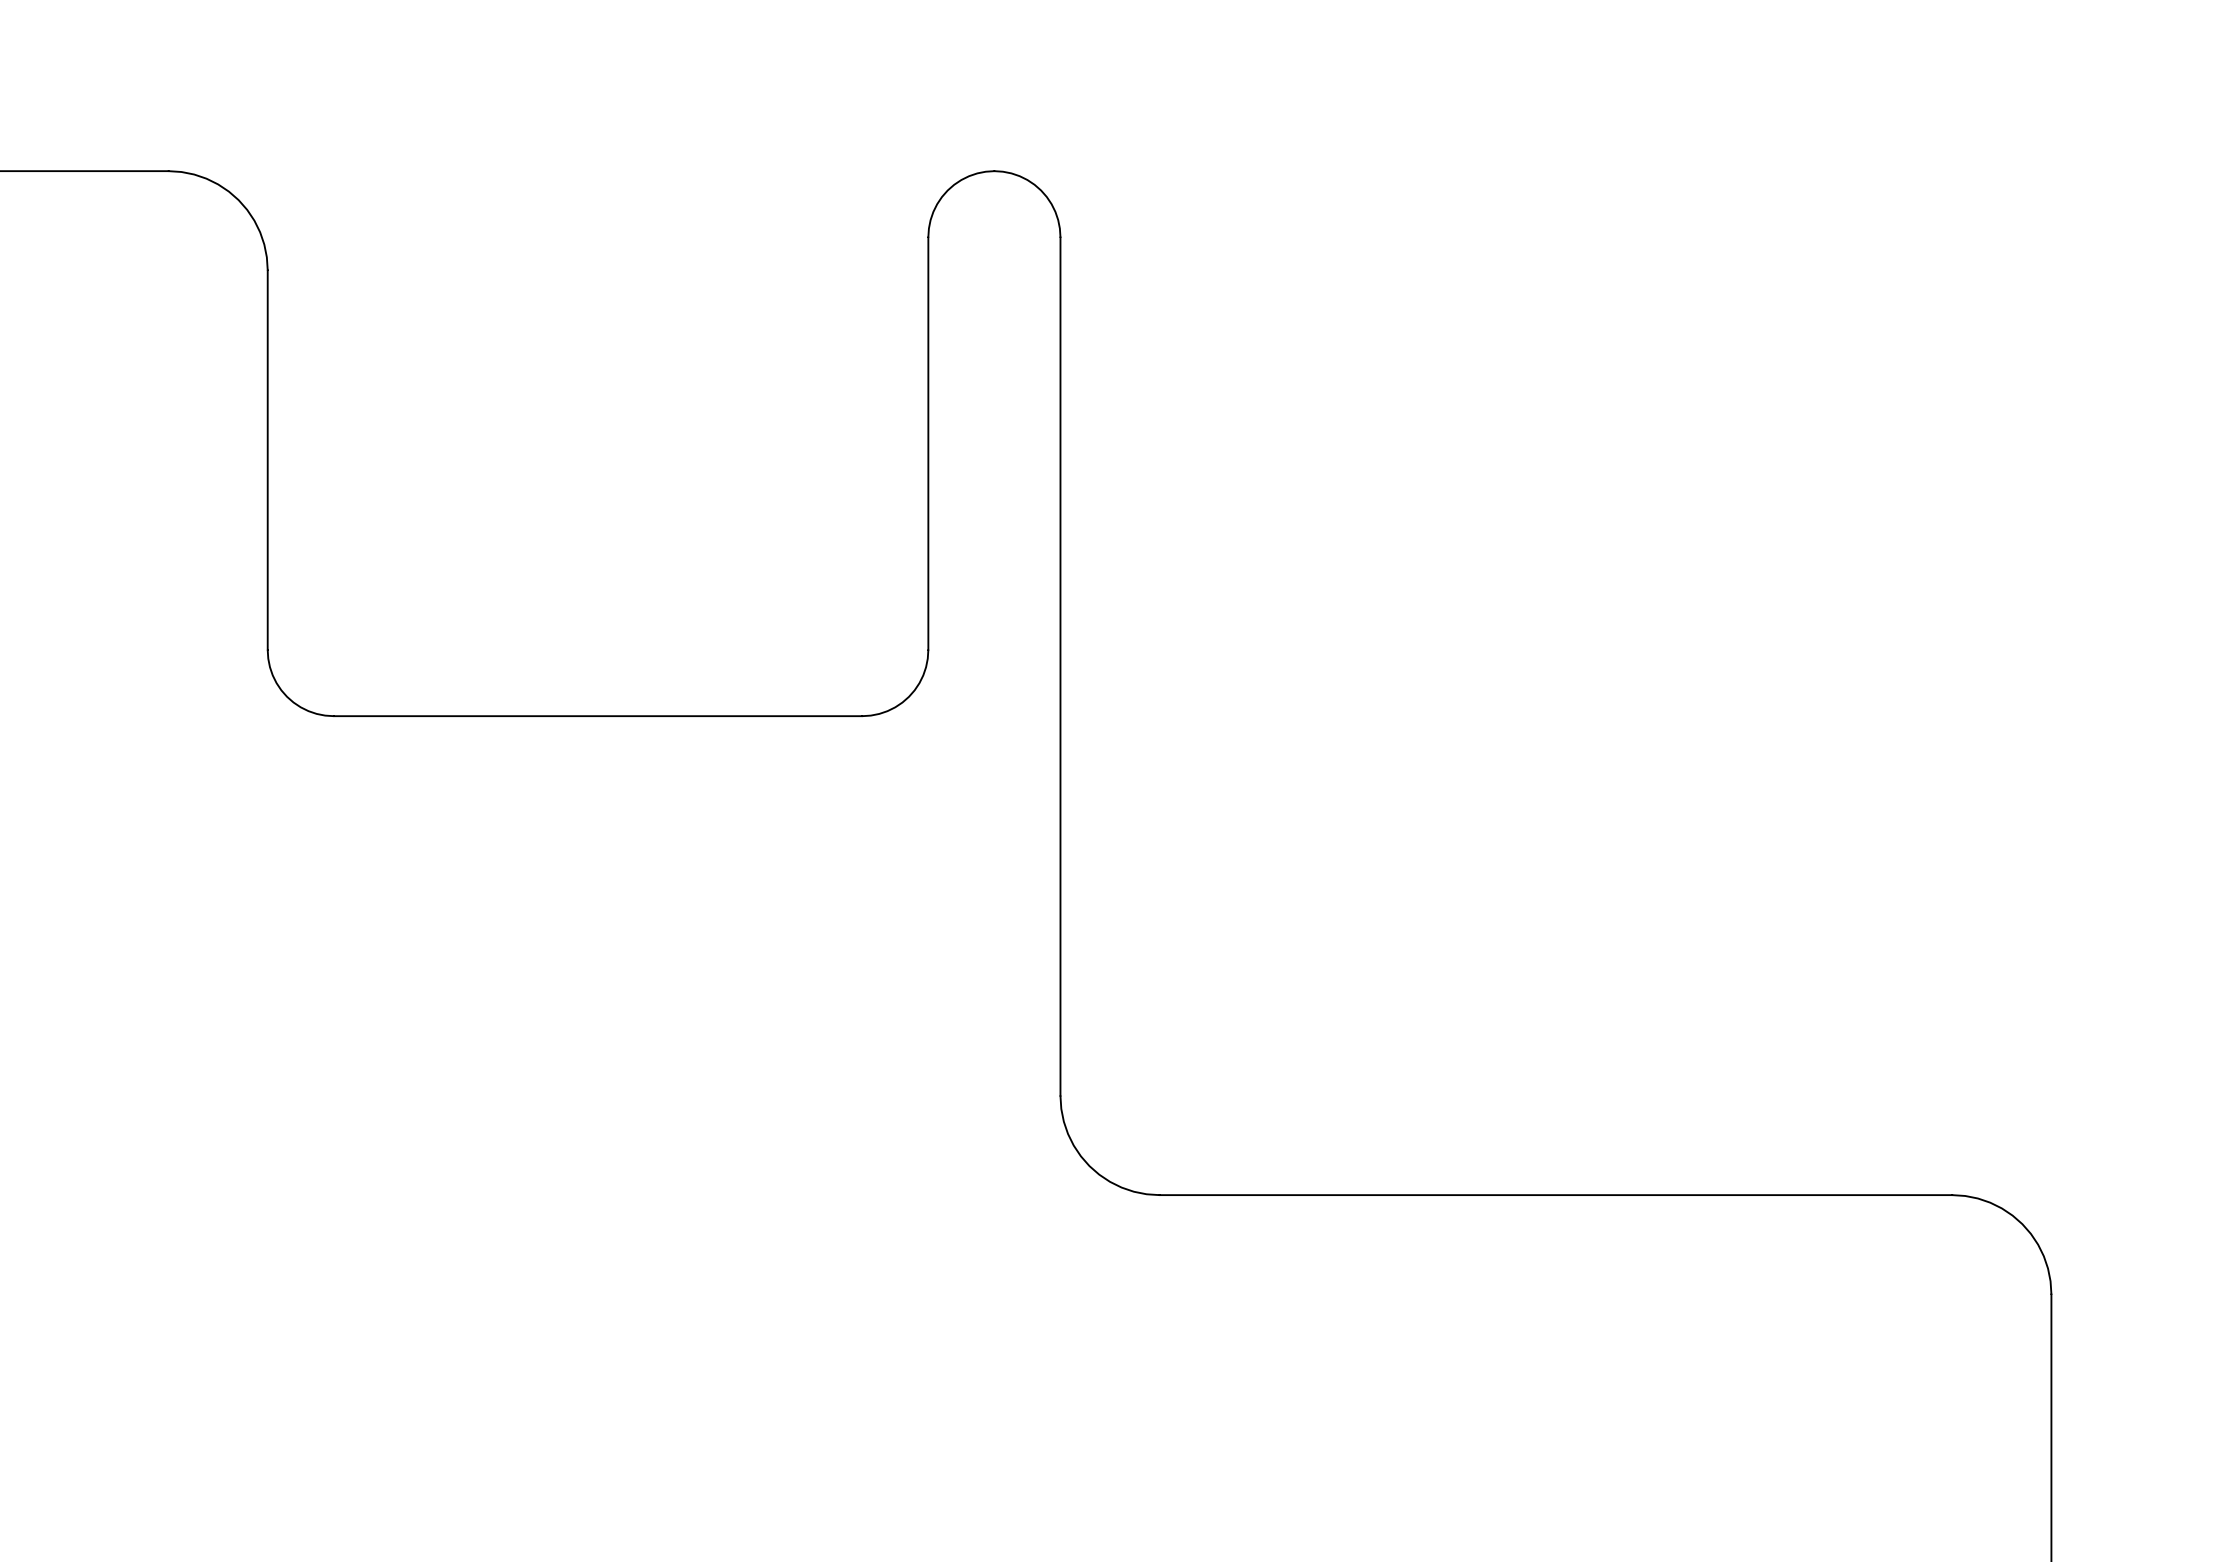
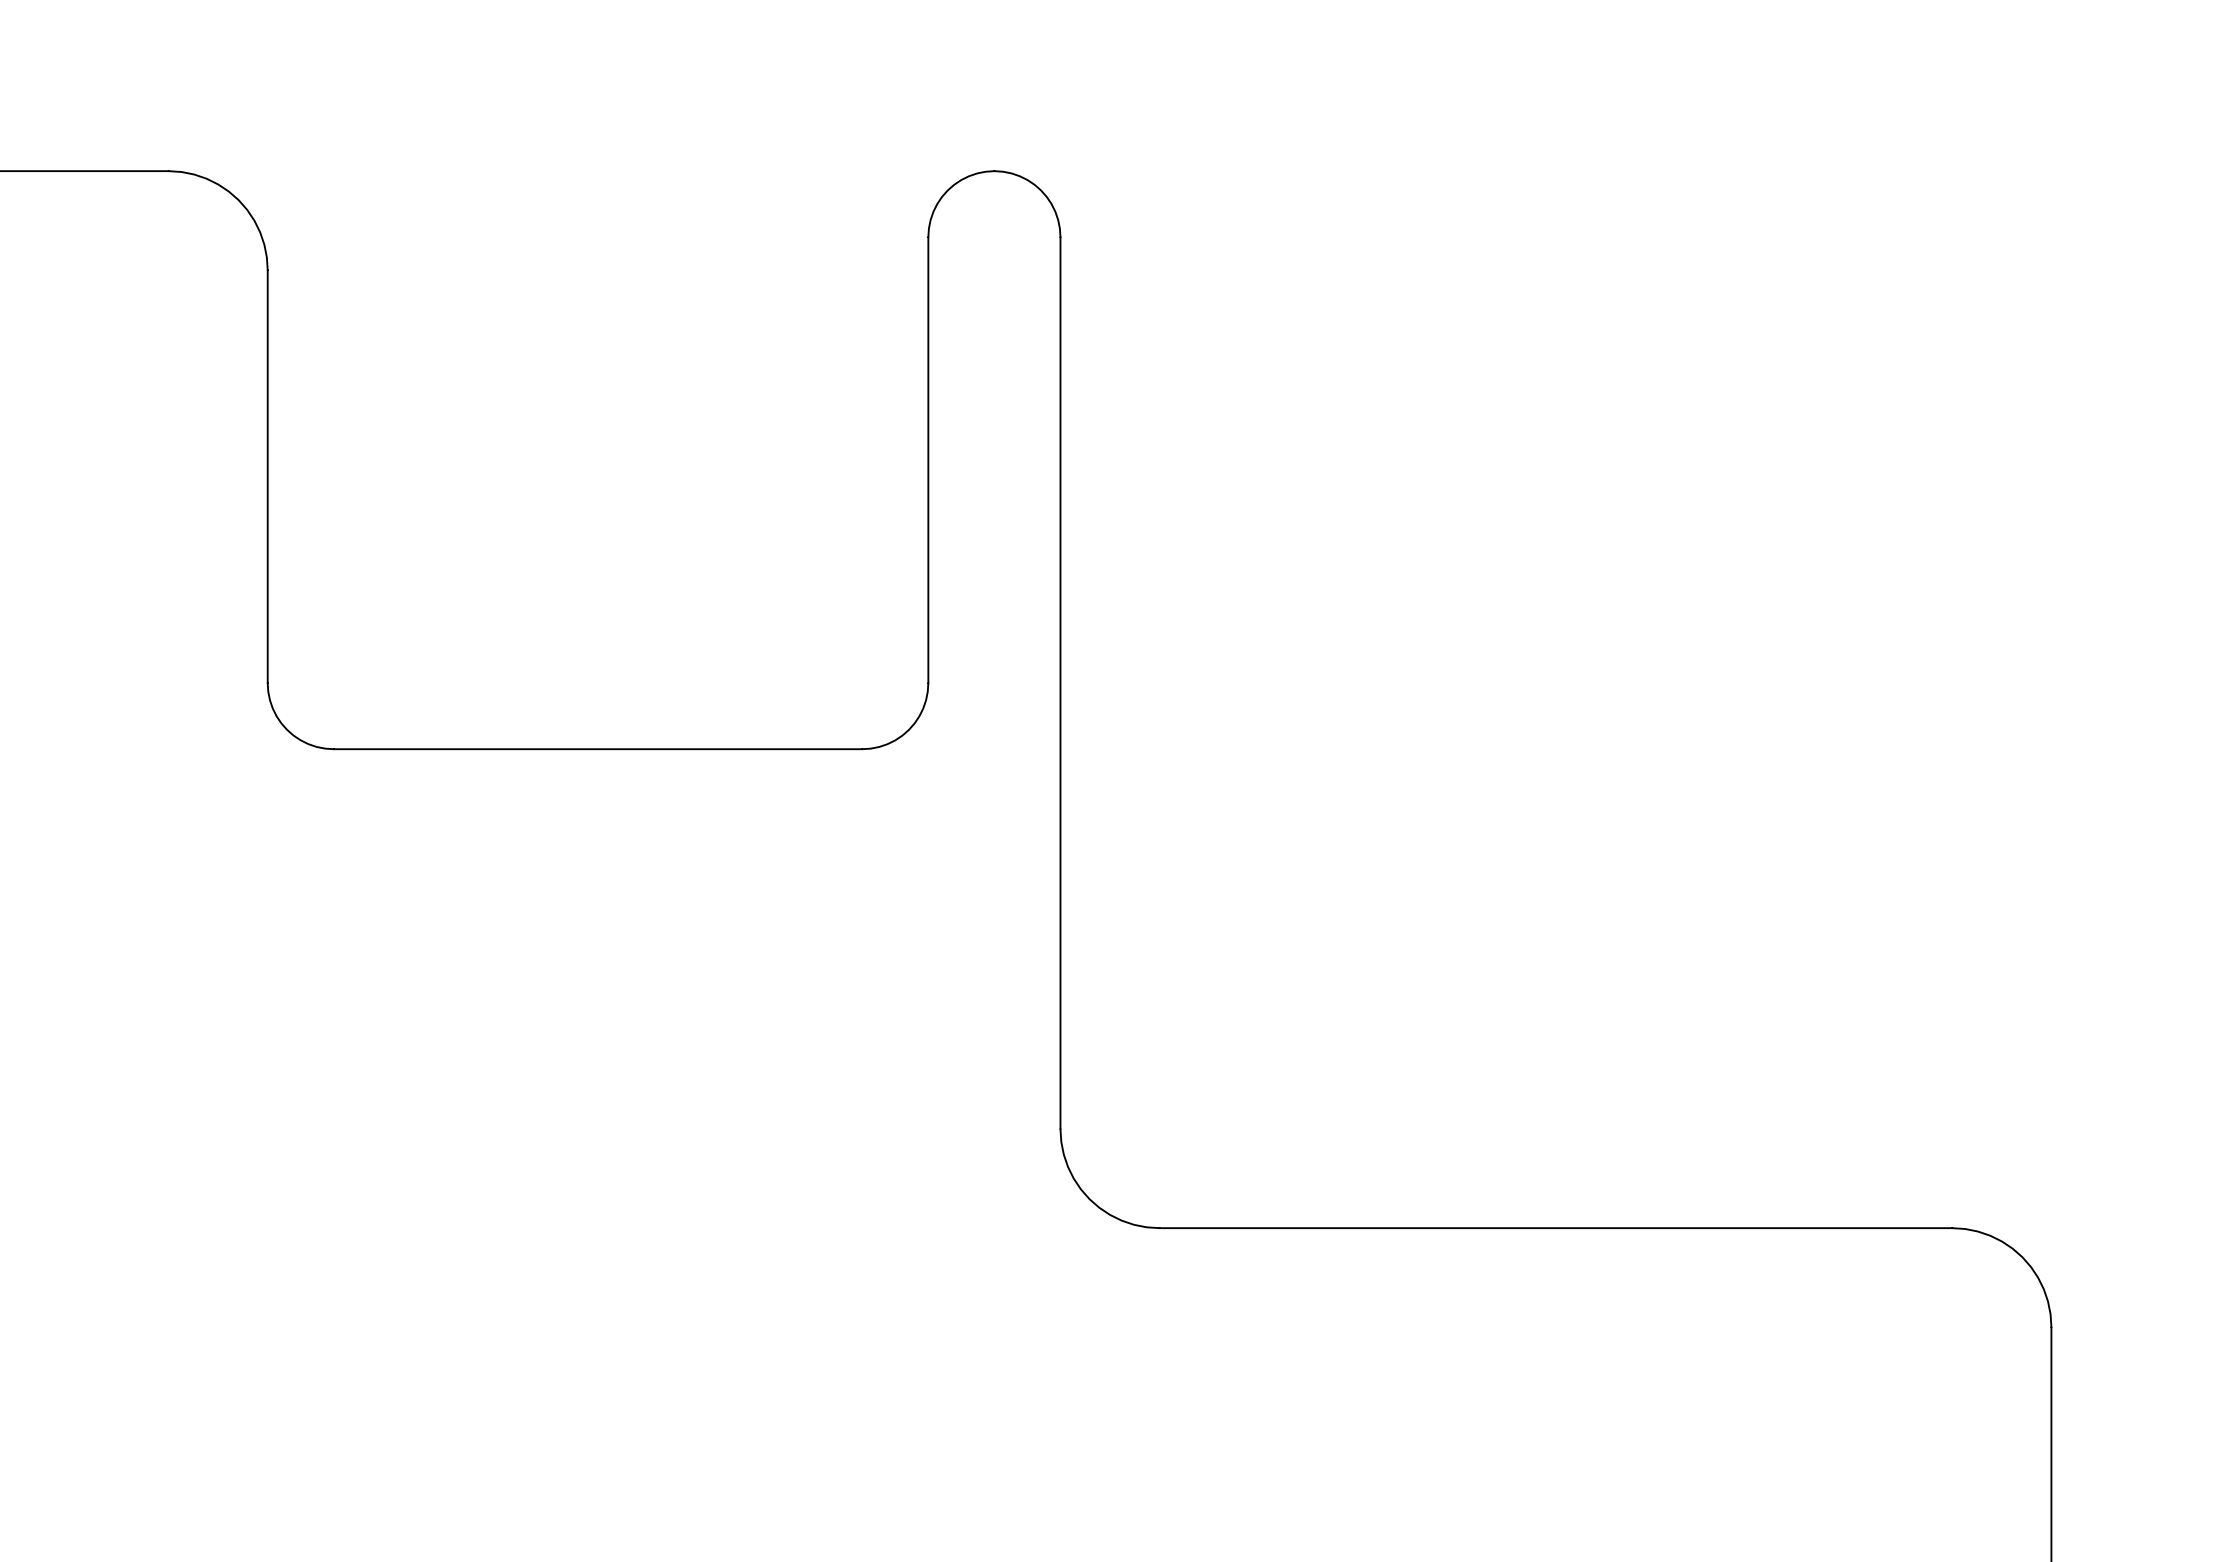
board edge: (267, 650) (272, 675) (287, 696) (308, 711) (333, 716) (870, 715) (895, 707) (914, 690) (923, 675) (928, 650) -> (267, 650) (268, 691) (276, 716) (287, 729) (300, 740) (316, 746) (333, 749) (870, 748) (887, 744) (902, 735) (919, 716) (927, 691) (928, 650)
board edge: (1060, 1096) (1061, 1108) (1068, 1133) (1073, 1145) (1089, 1166) (1110, 1181) (1121, 1187) (1146, 1194) (1952, 1195) (1977, 1198) (2001, 1208) (2012, 1215) (2022, 1224) (2038, 1244) (2048, 1268) (2050, 1281) (2051, 1327) -> (1060, 1096) (1061, 1142) (1063, 1154) (1073, 1178) (1089, 1199) (1099, 1207) (1110, 1214) (1133, 1224) (1159, 1228) (1965, 1229) (1990, 1235) (2001, 1241) (2022, 1257) (2038, 1277) (2043, 1289) (2050, 1314) (2051, 1327)

